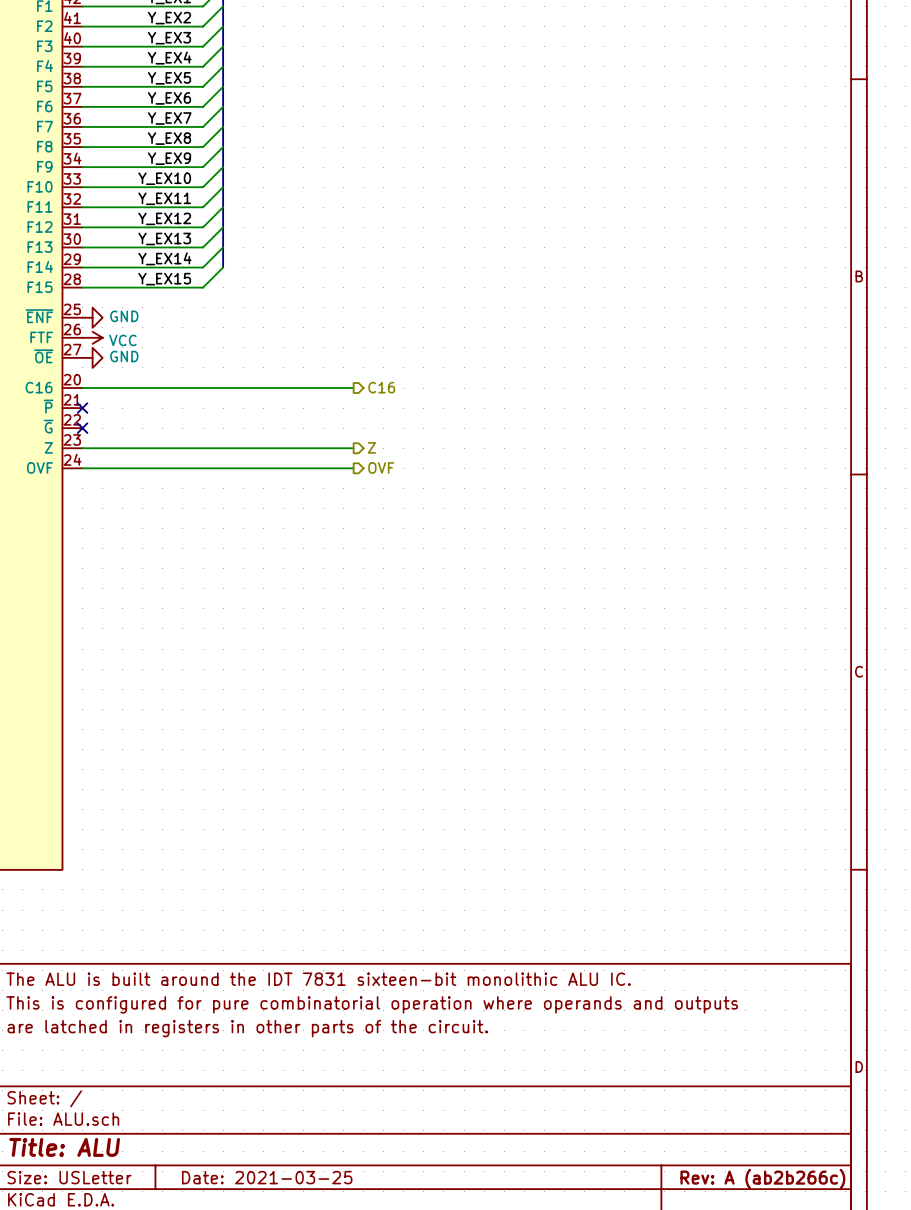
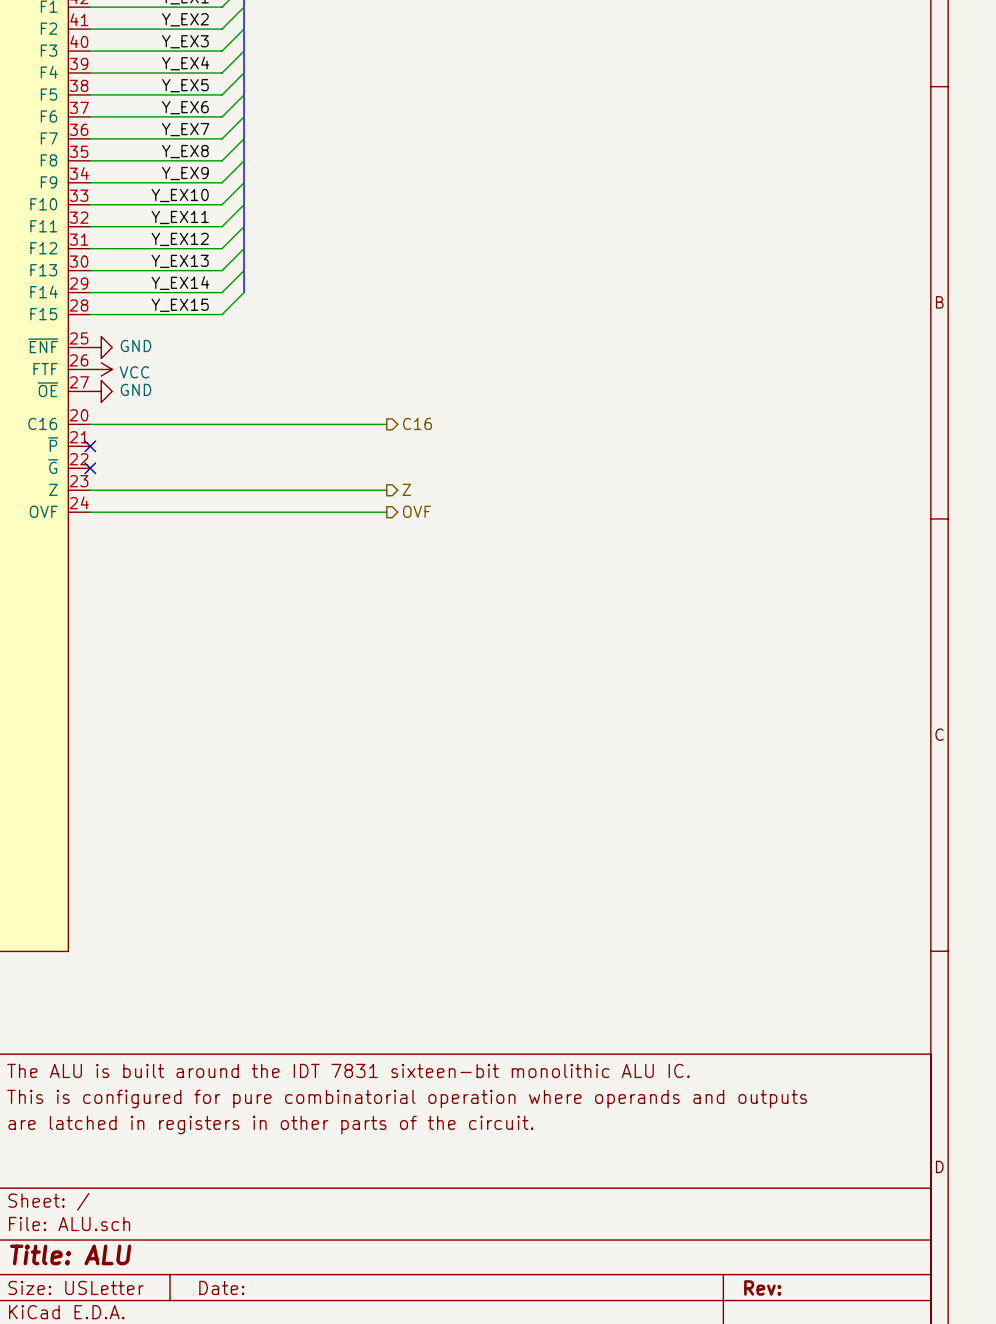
title block: Date: 2021-03-25 (267, 1177) -> Date: (221, 1287)
title block: Rev: A (ab2b266c) (762, 1179) -> Rev: (762, 1287)

